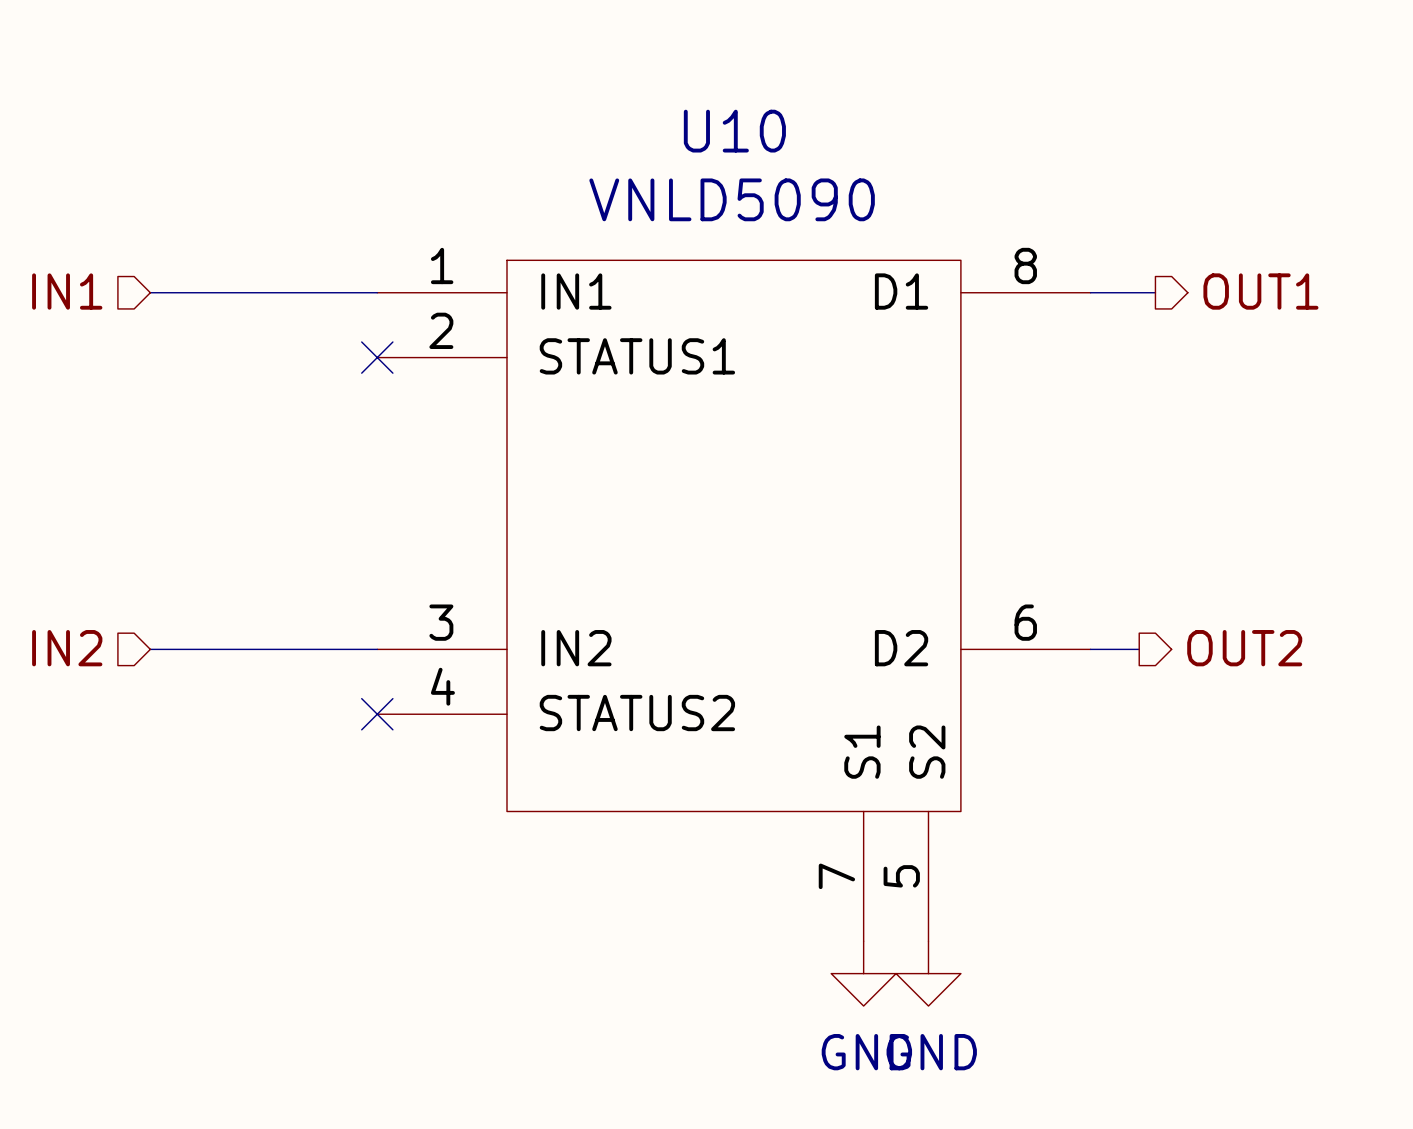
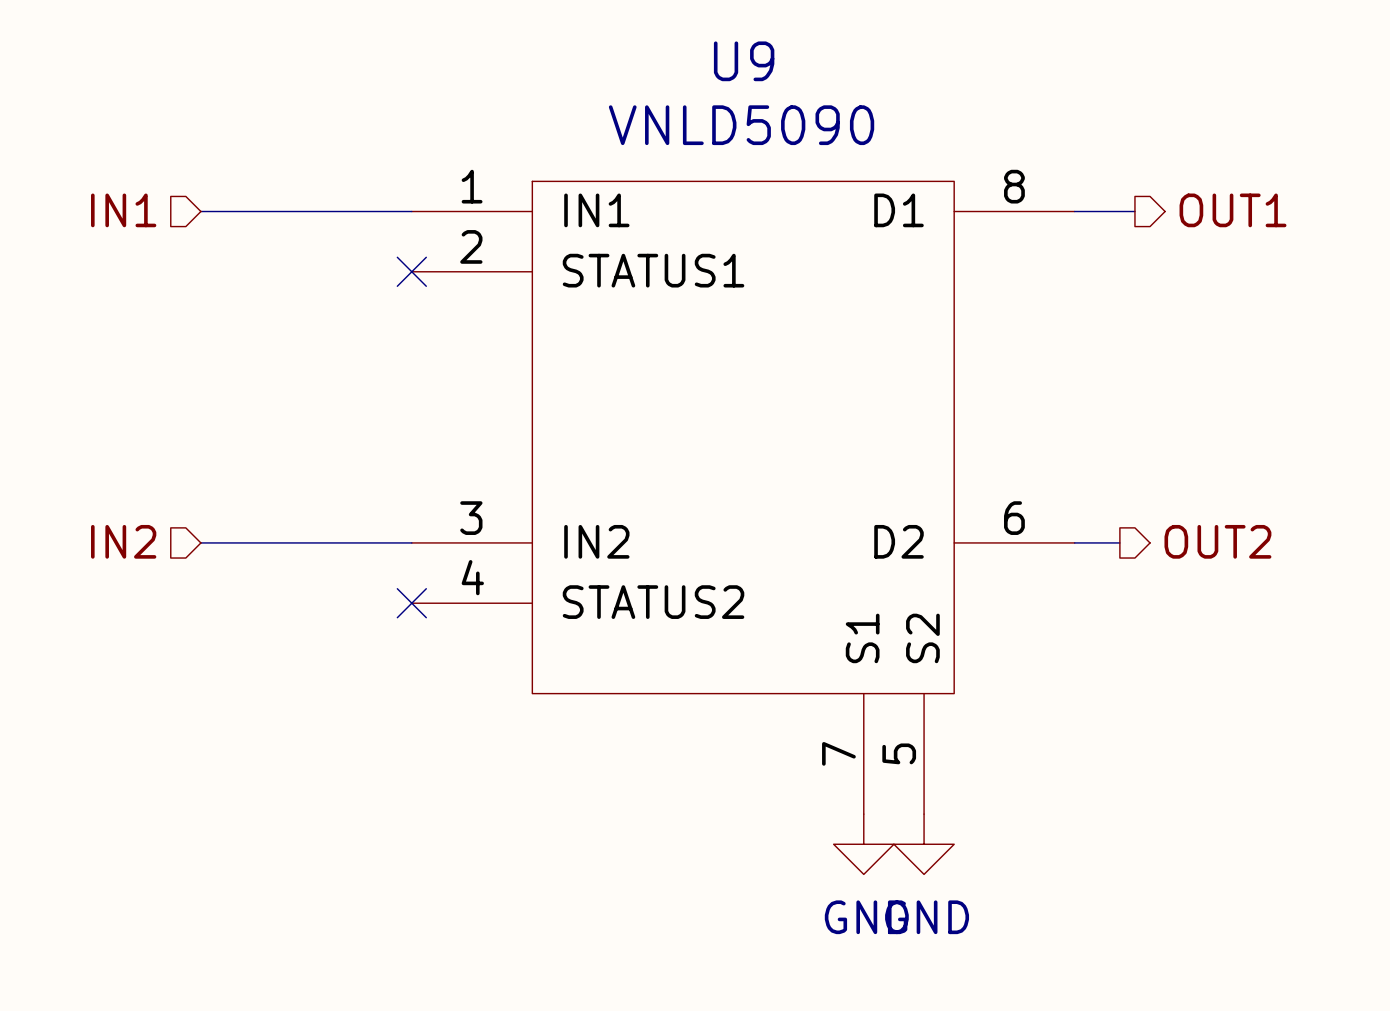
U10 name: U10 (734, 131) -> U9 (744, 61)

